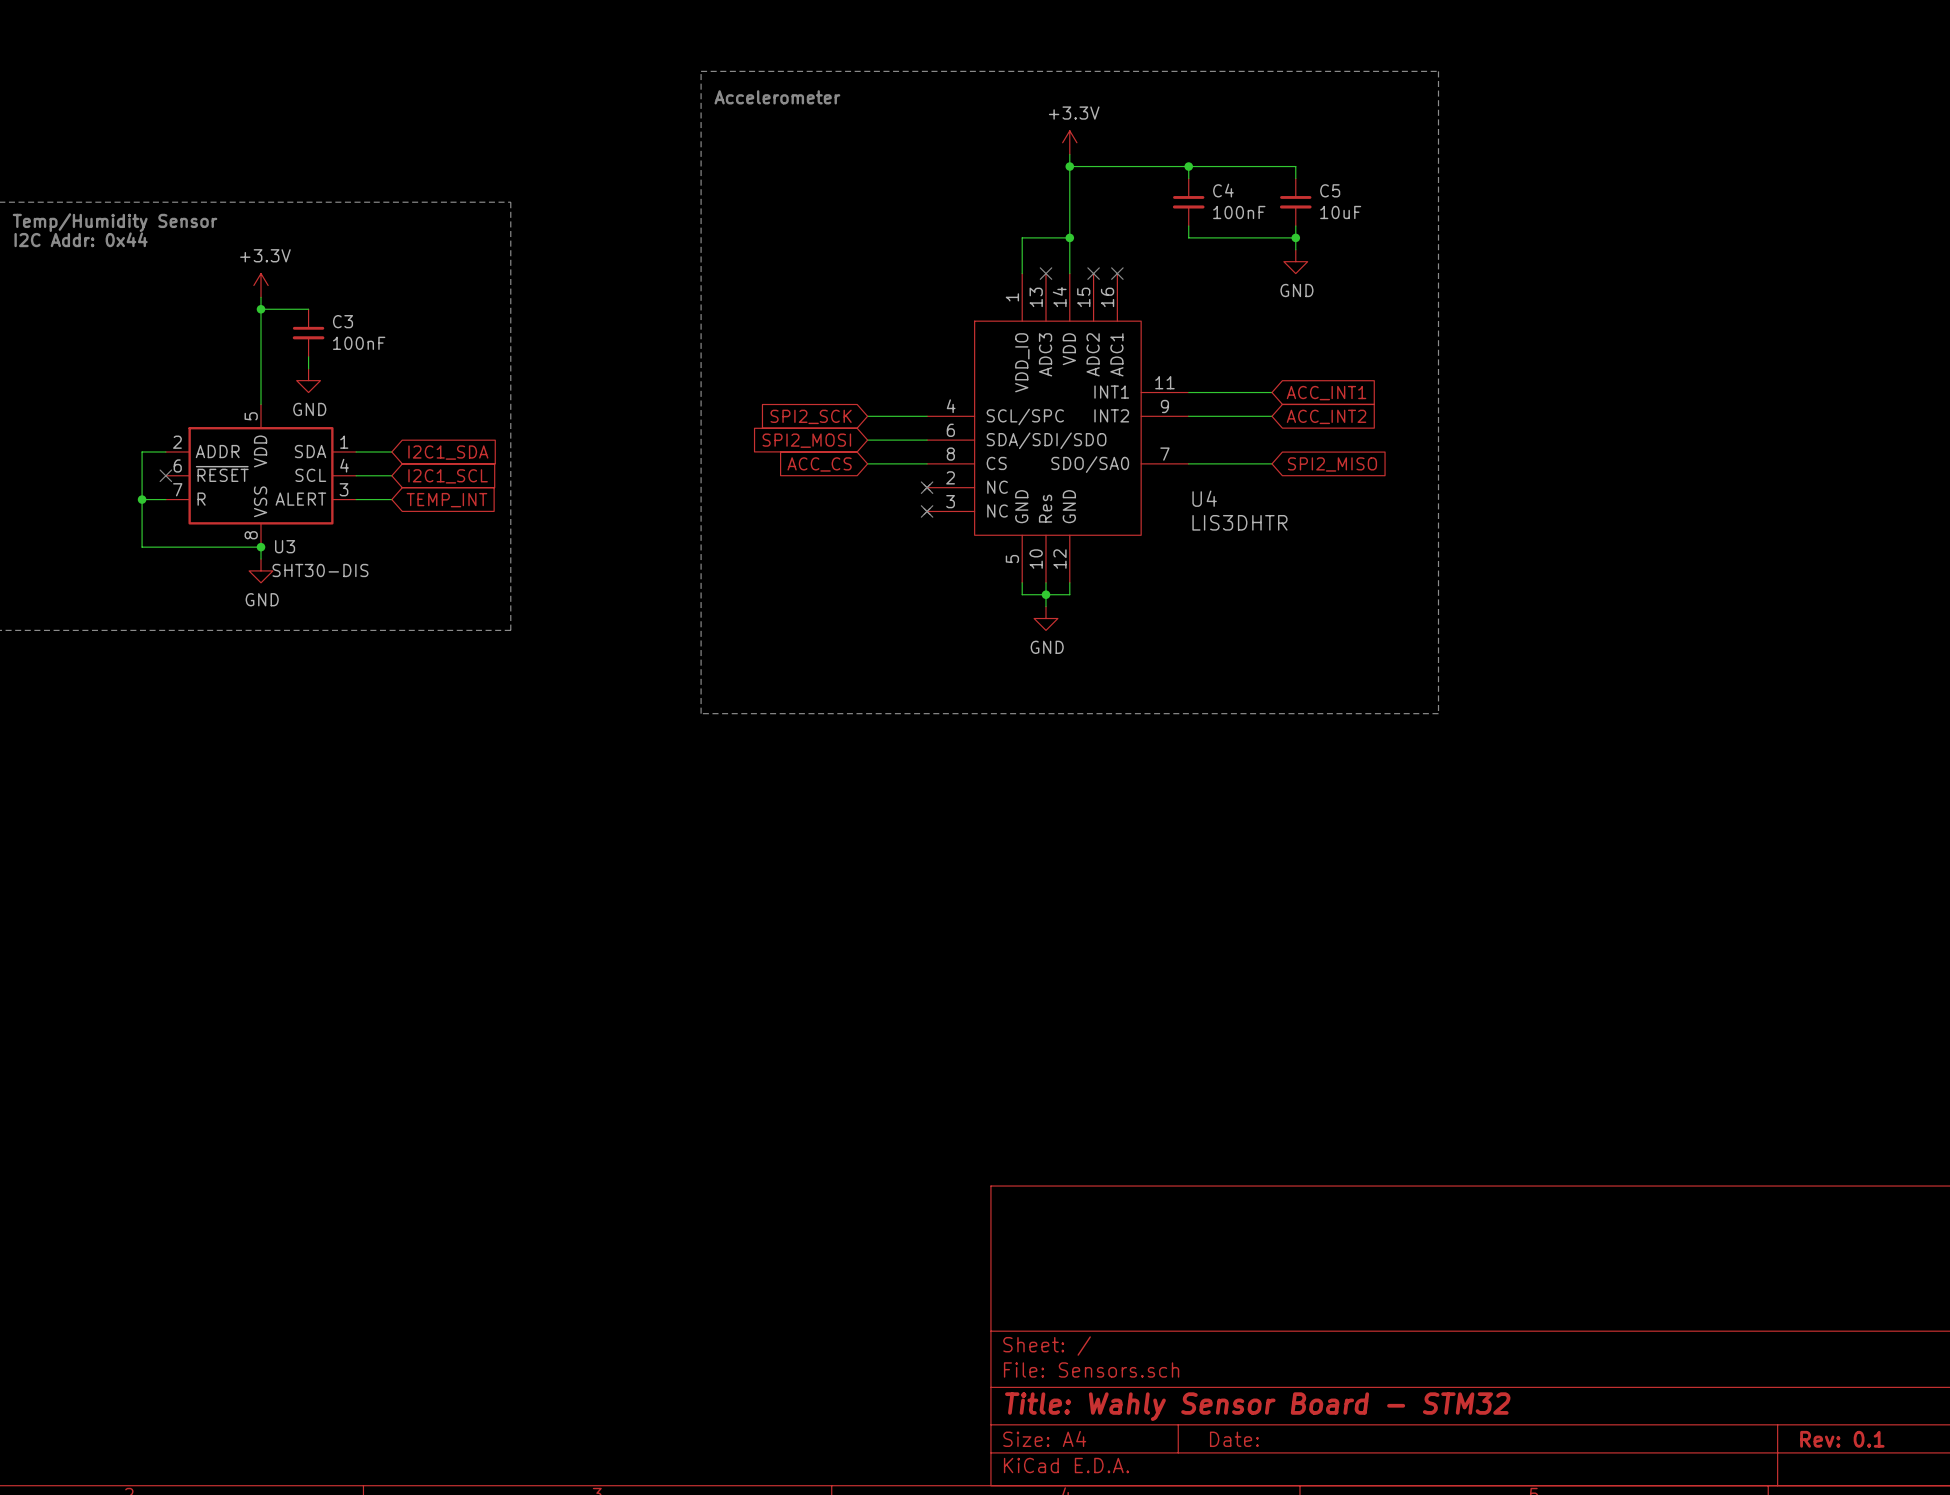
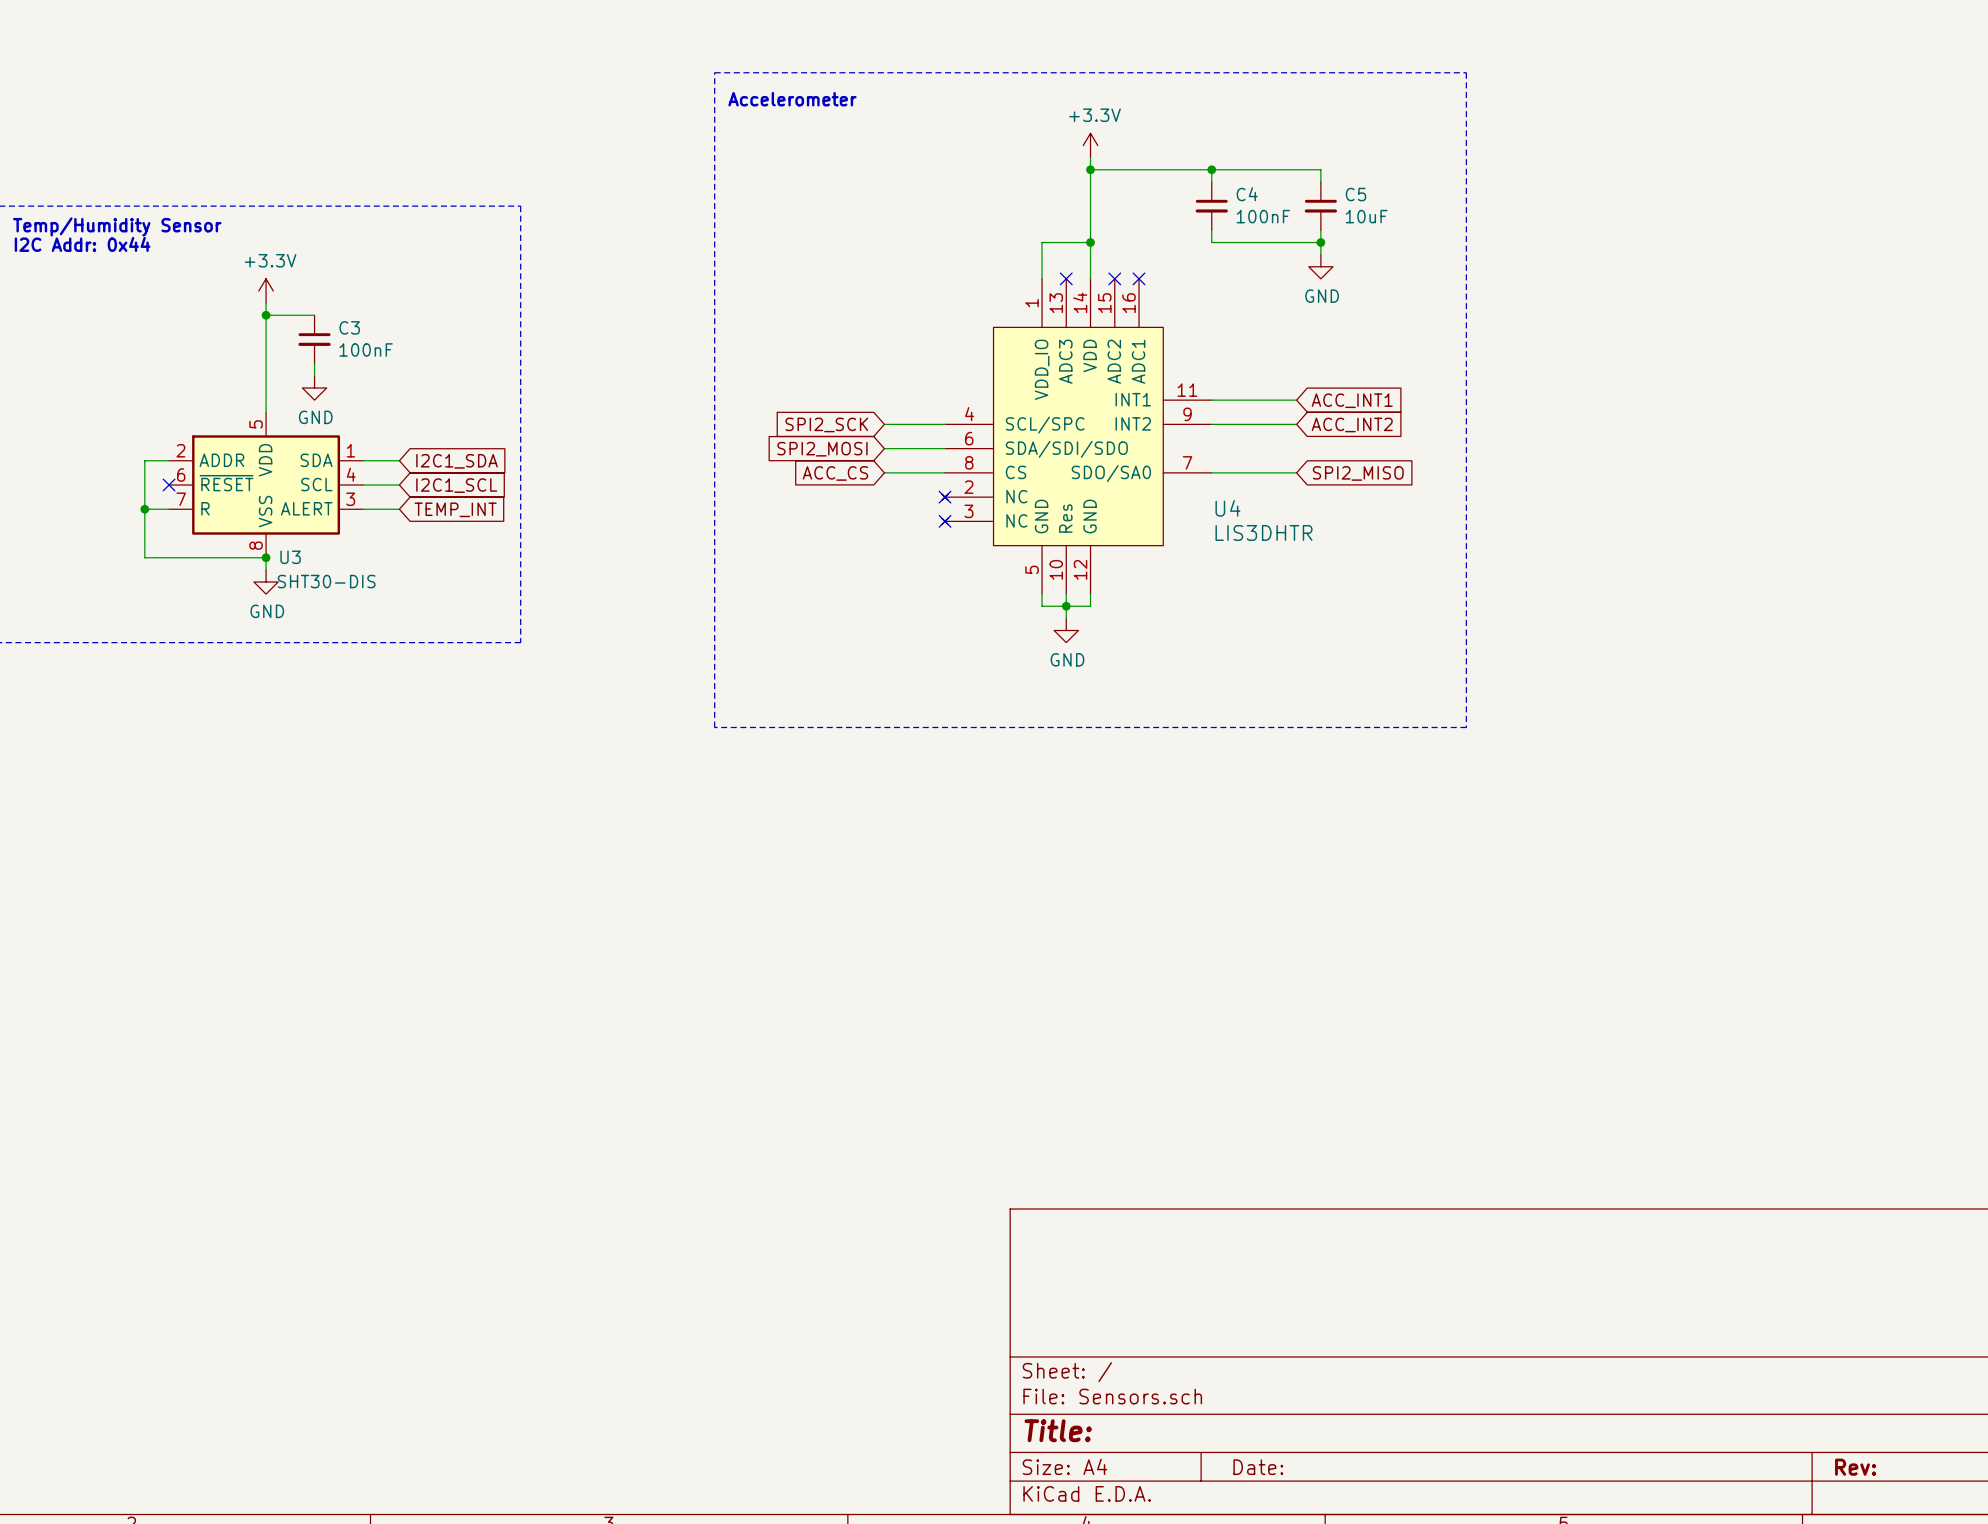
title block: Title: Wahly Sensor Board - STM32 (1257, 1406) -> Title: (1058, 1430)
title block: Rev: 0.1 (1842, 1439) -> Rev: (1855, 1467)

